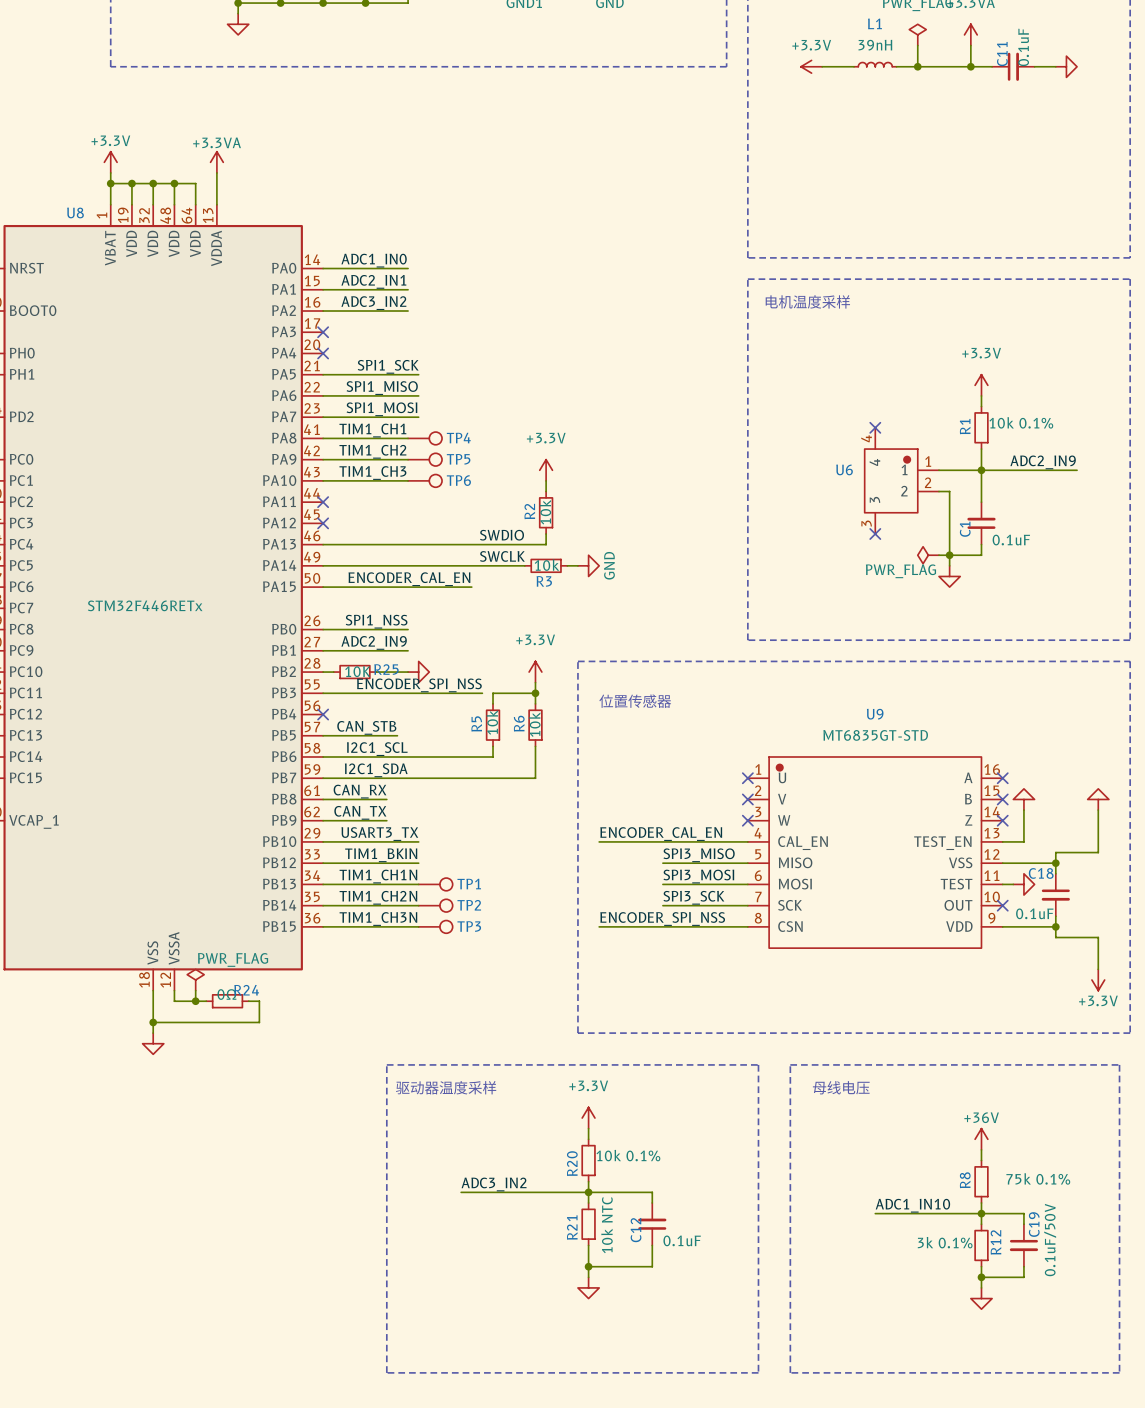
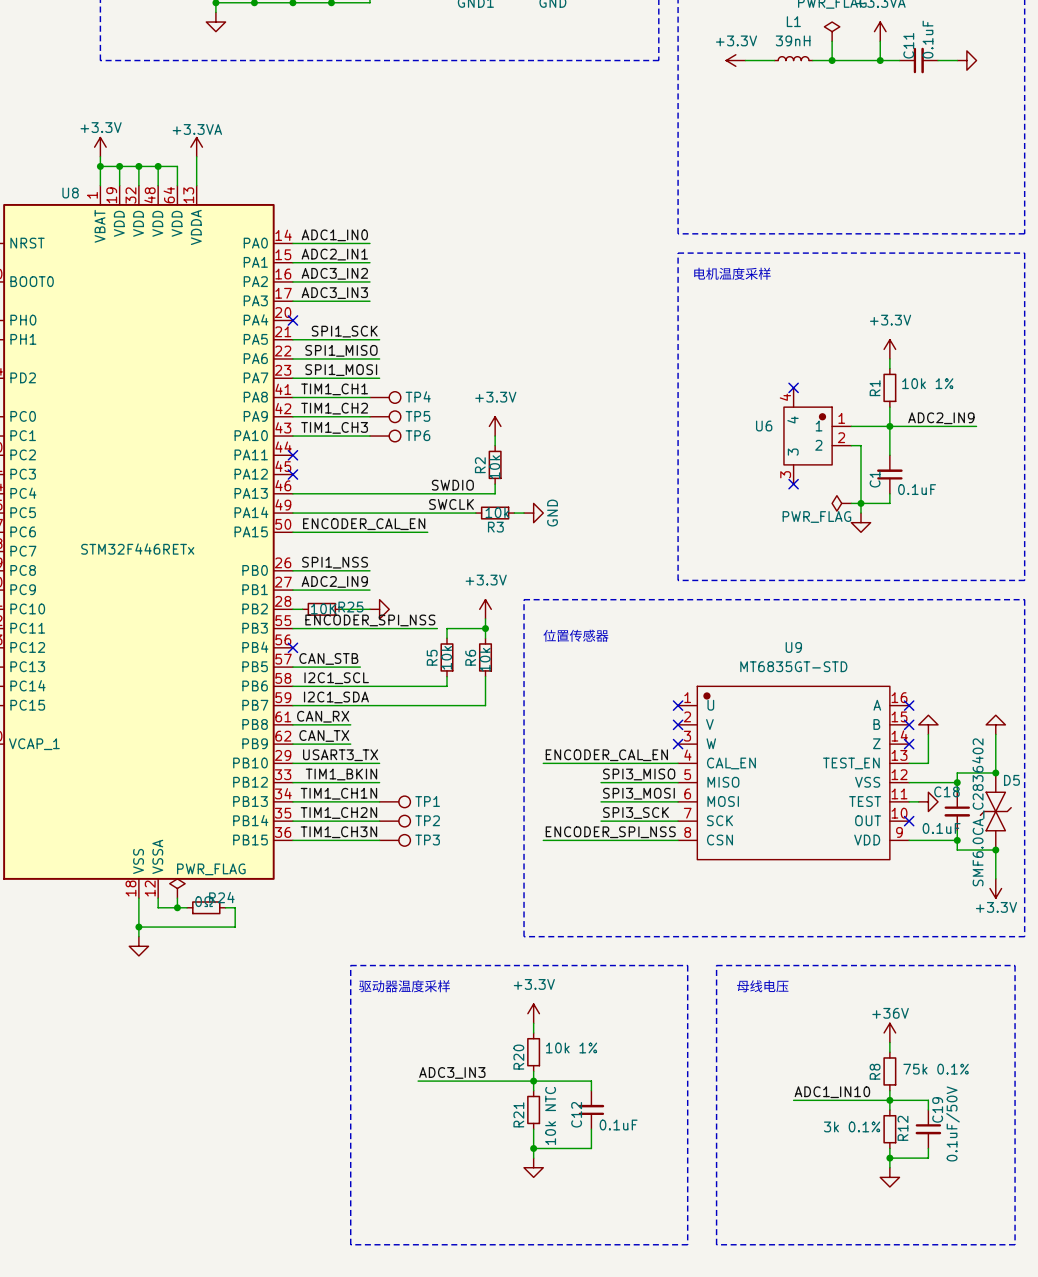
label: none -> ADC3_IN3 (334, 293)
wire: none -> (292, 301) (369, 301)
no-connect mark: (323, 332) -> none
R1 value: 10k 0.1% (1021, 422) -> 10k 1% (927, 383)
junction: none -> (995, 772)
D5: none -> SMF6.0CA_C2836402 (995, 811)
junction: none -> (995, 850)
R20 value: 10k 0.1% (628, 1155) -> 10k 1% (571, 1047)
label: ADC3_IN2 (494, 1184) -> ADC3_IN3 (452, 1072)

